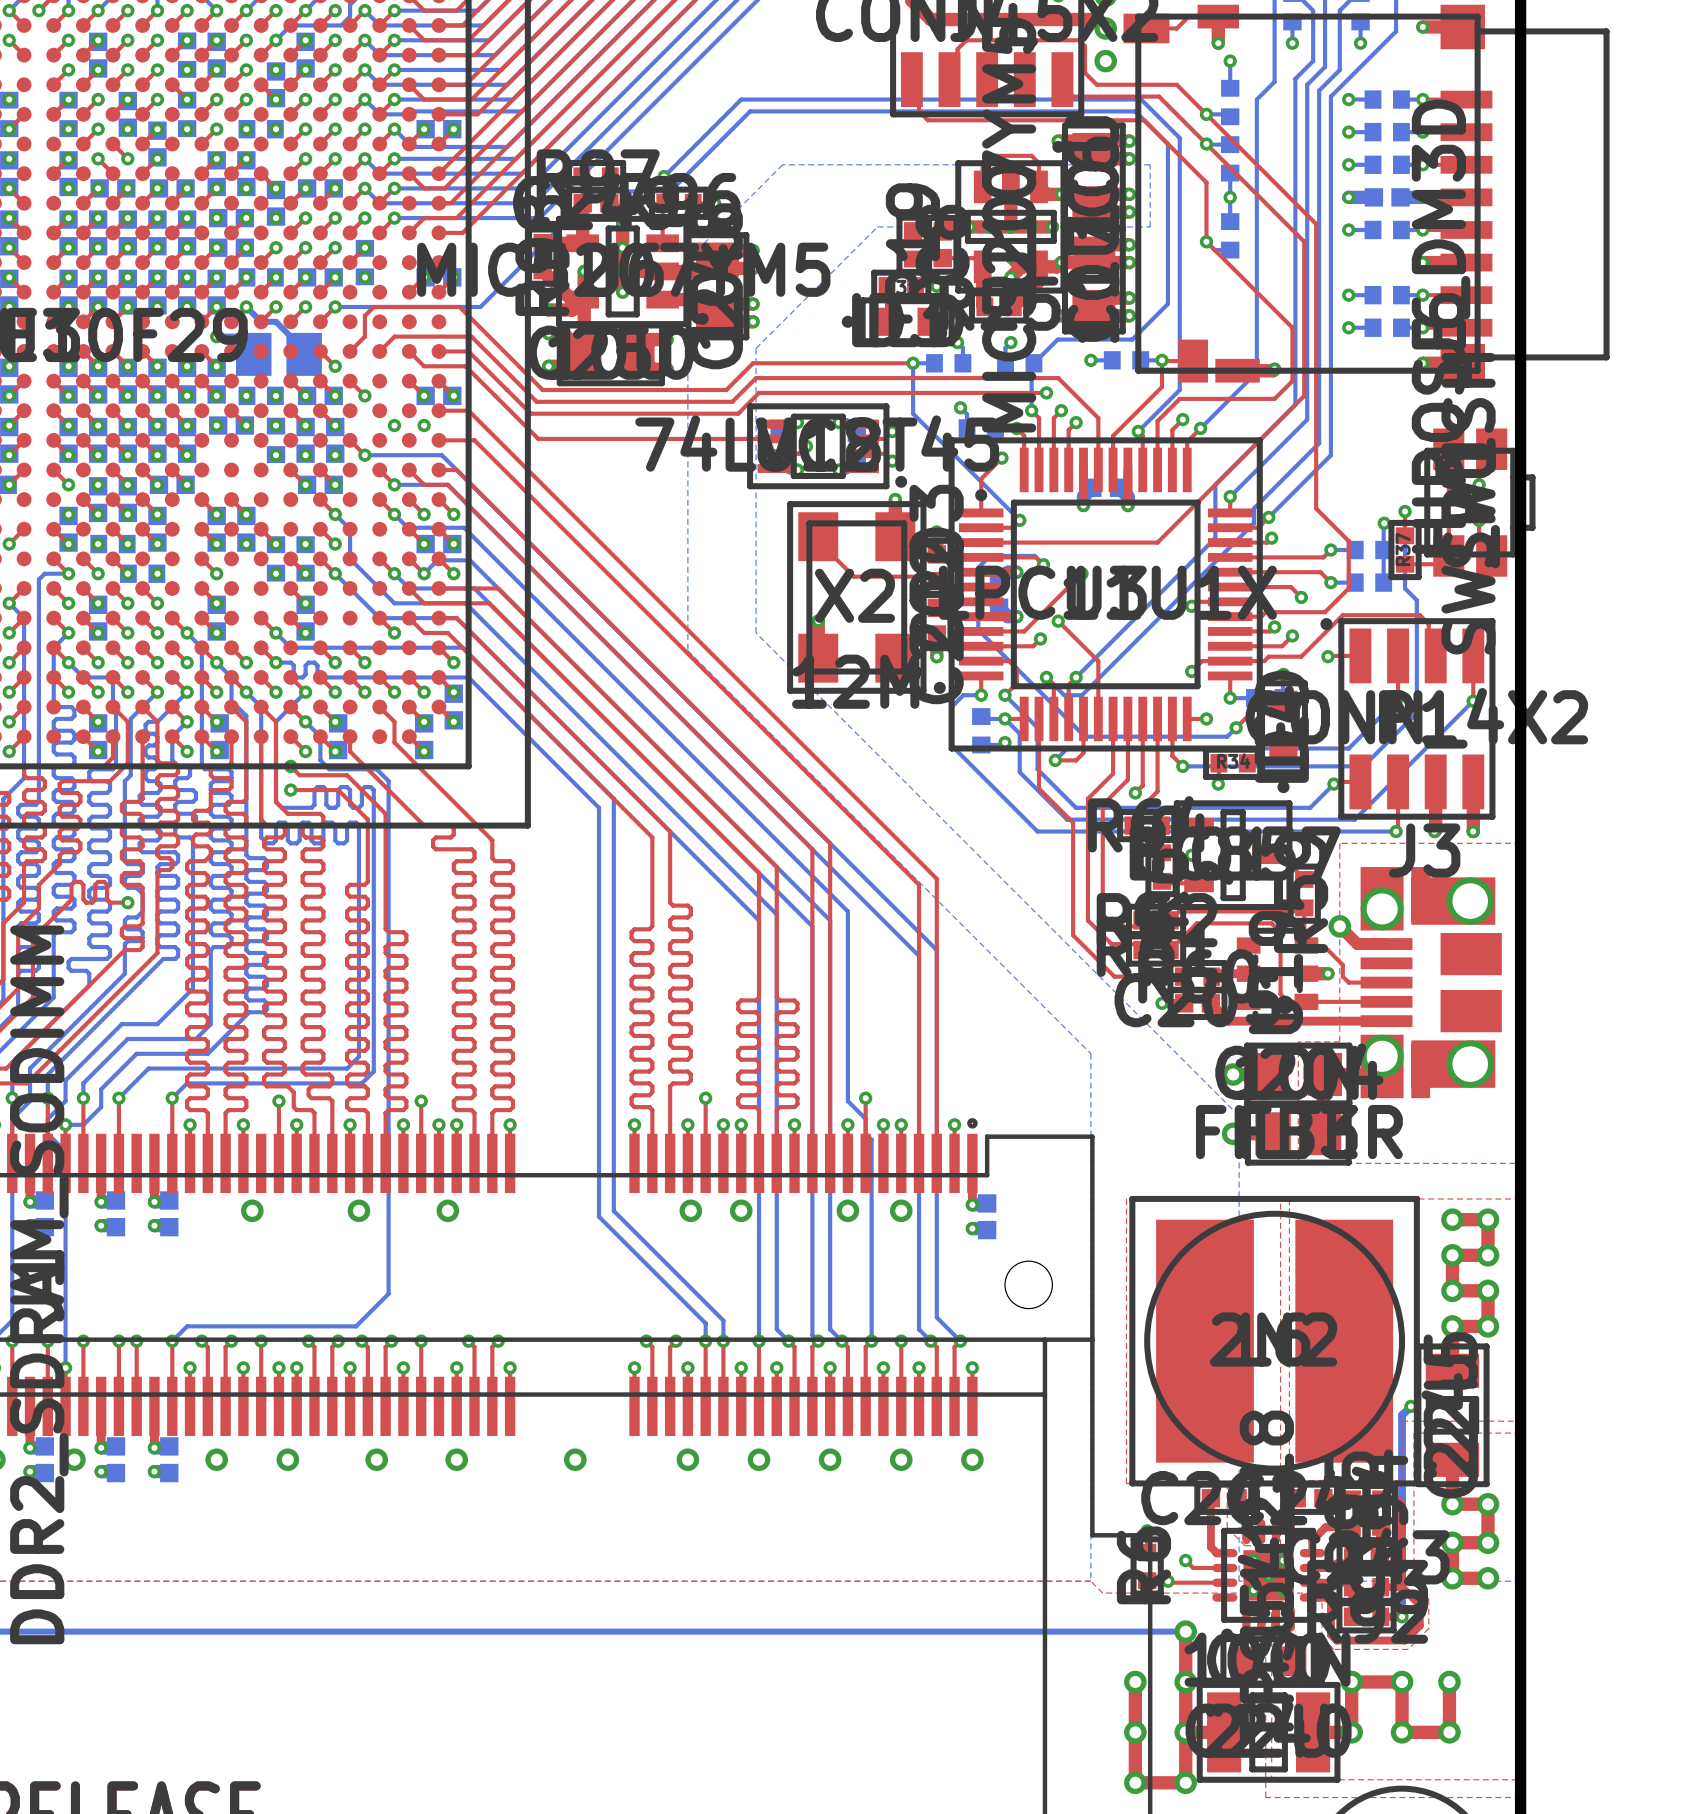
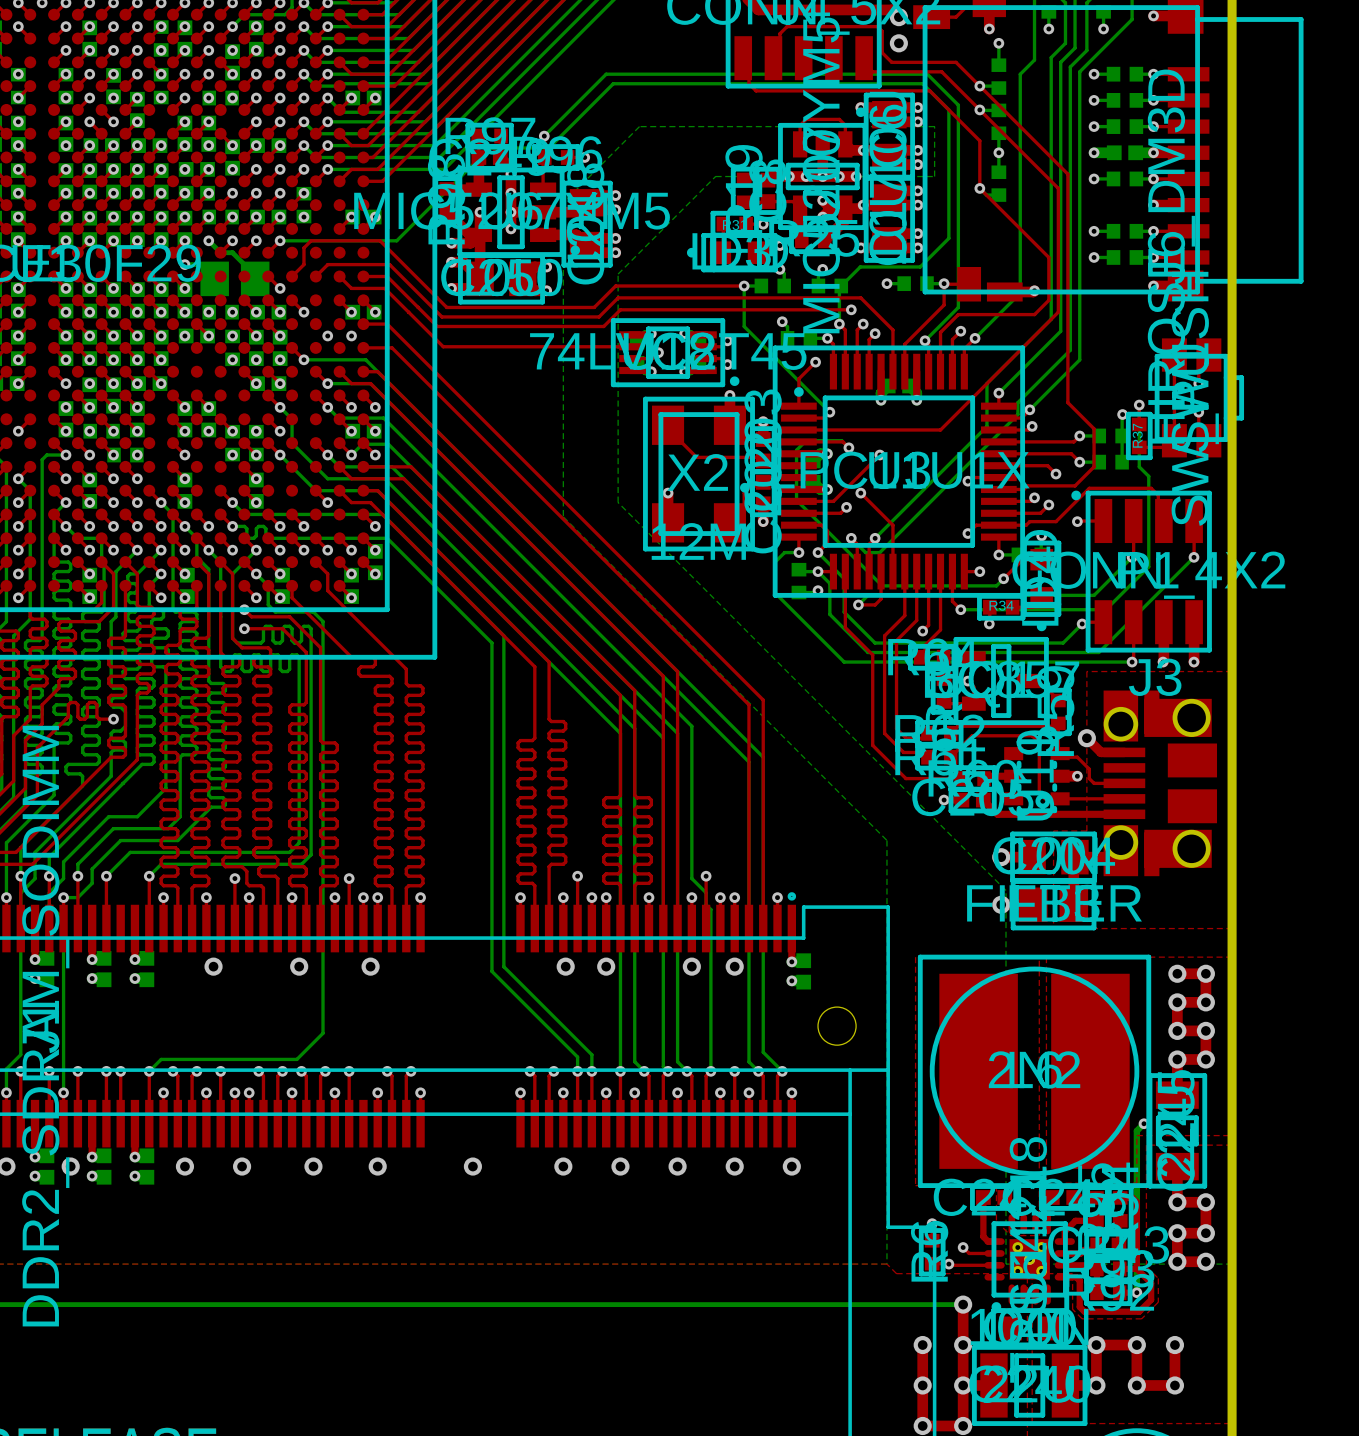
X2 footprint: [787, 501, 946, 694] -> [643, 396, 755, 552]

